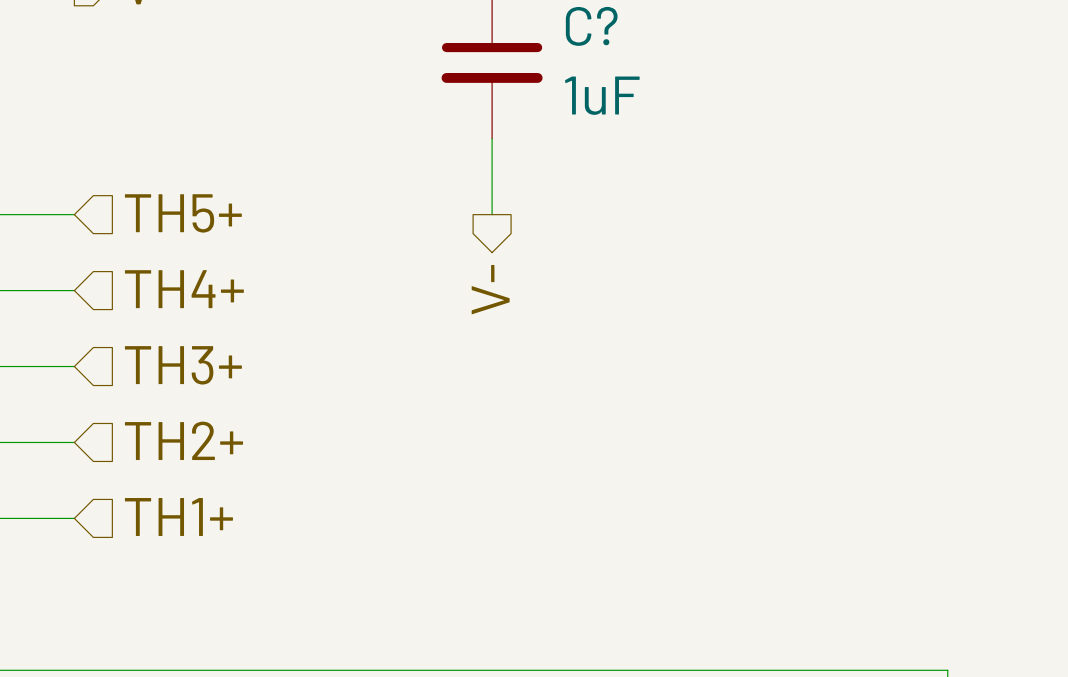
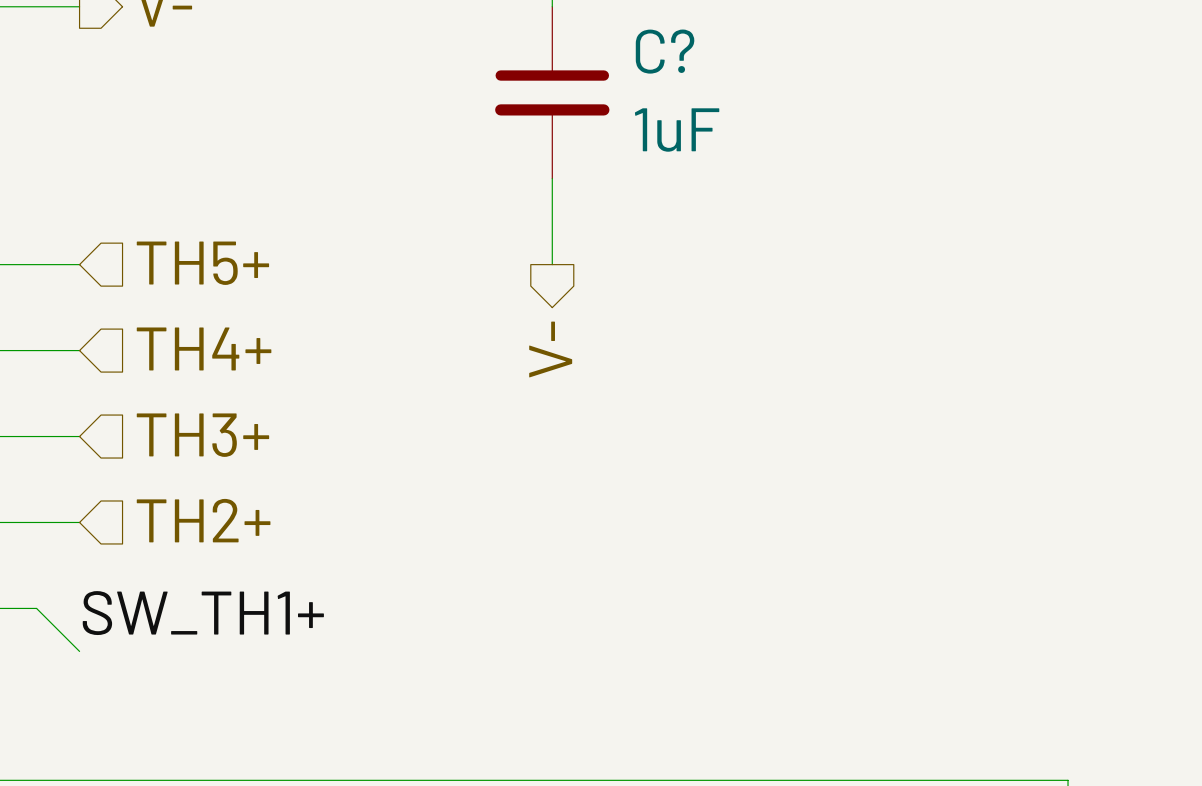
hierarchical label: TH1+ (178, 517) -> none
wire: (36, 518) (74, 518) -> (36, 608) (79, 651)
label: none -> SW_TH1+ (203, 613)

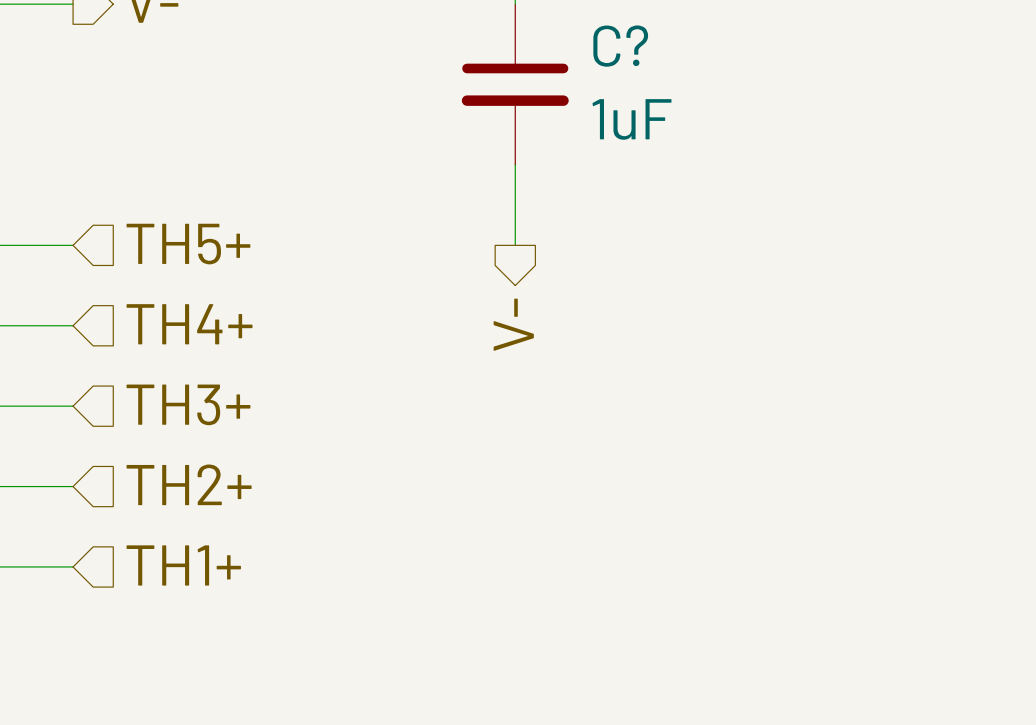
hierarchical label: none -> TH1+ (183, 565)
wire: (36, 608) (79, 651) -> (32, 566) (73, 566)
label: SW_TH1+ (203, 613) -> none

